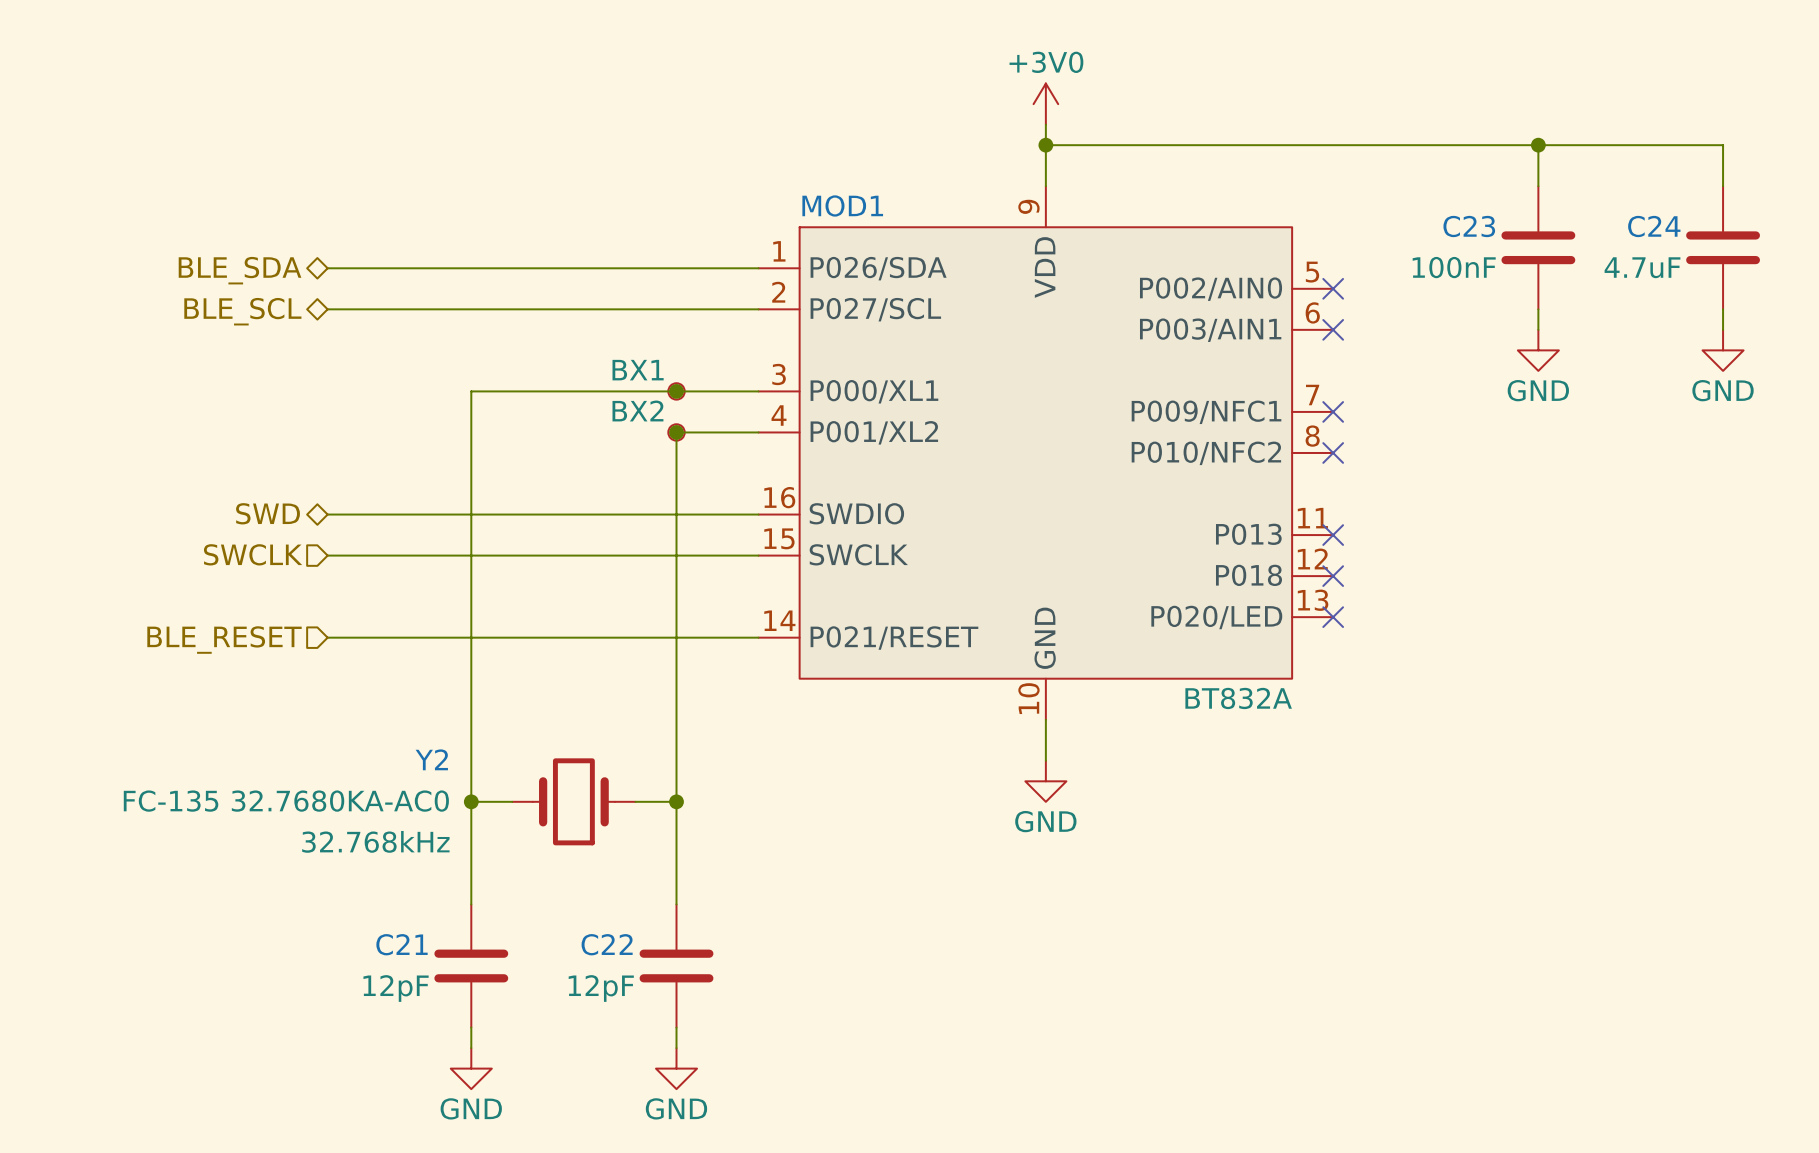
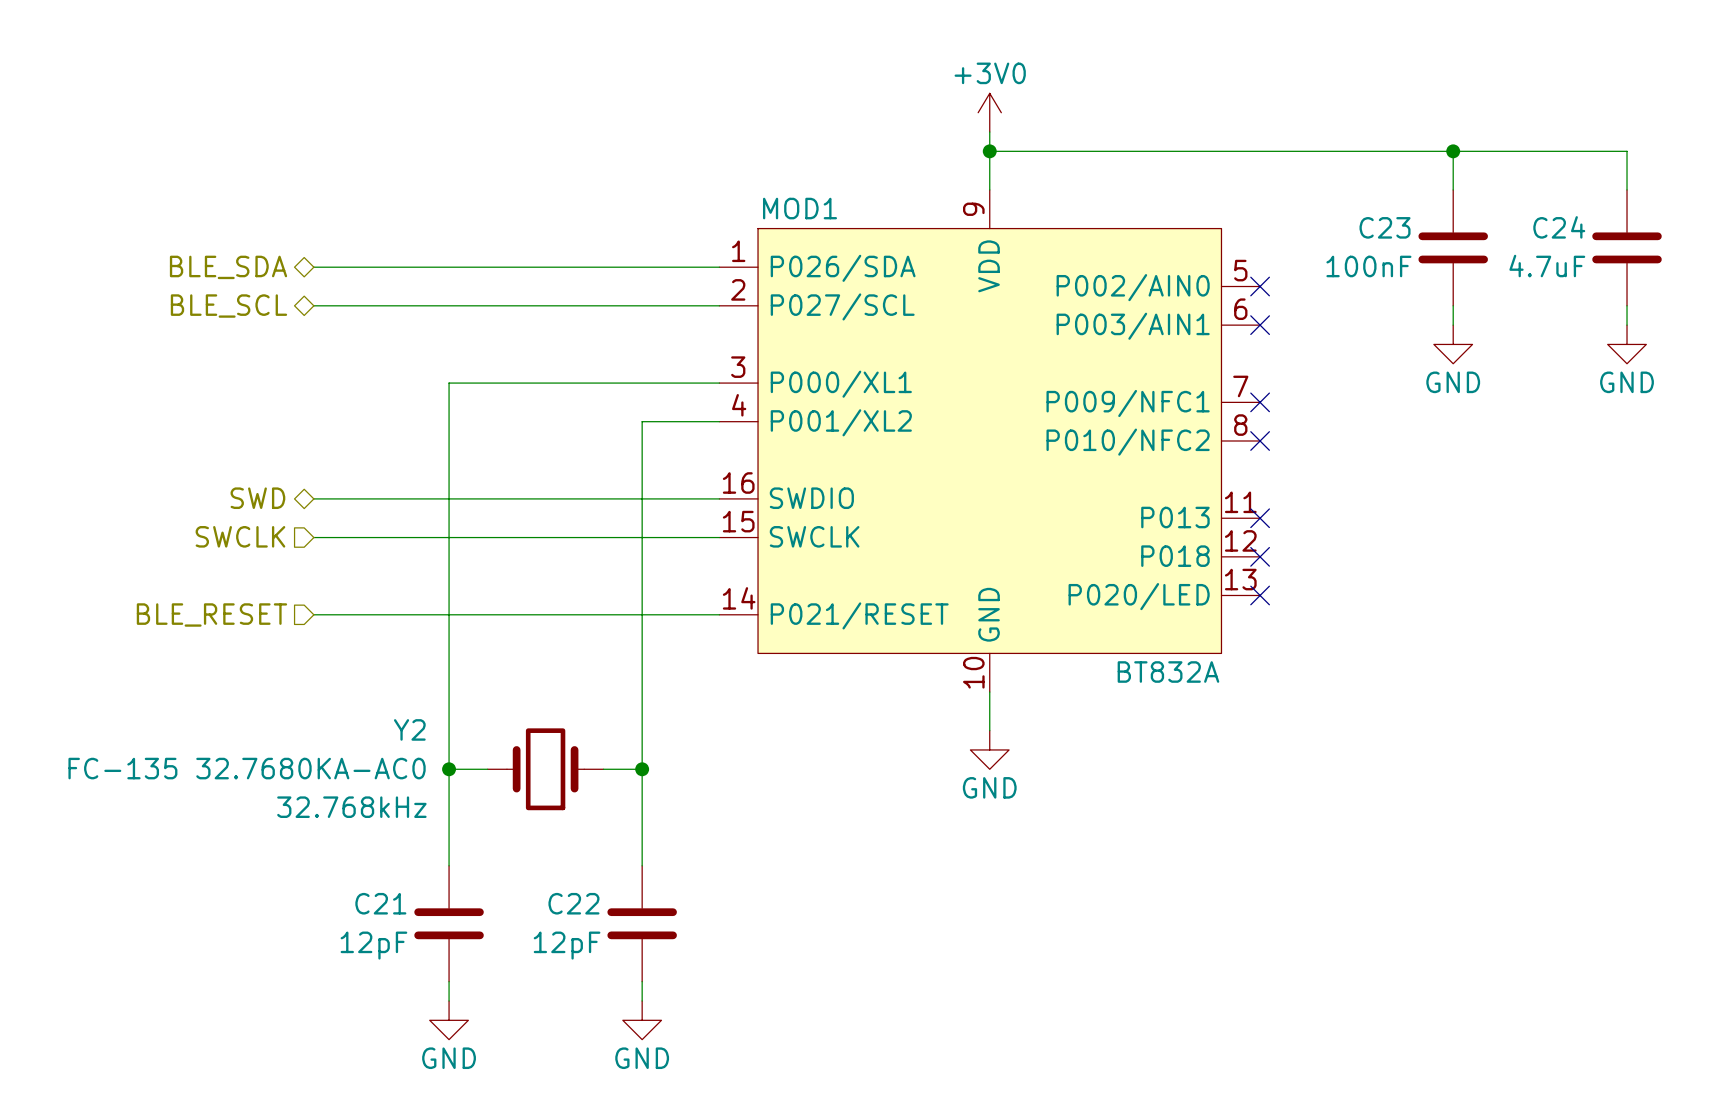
junction: (676, 391) -> none
part: BX1 (676, 391) -> none
junction: (676, 432) -> none
part: BX2 (676, 432) -> none

